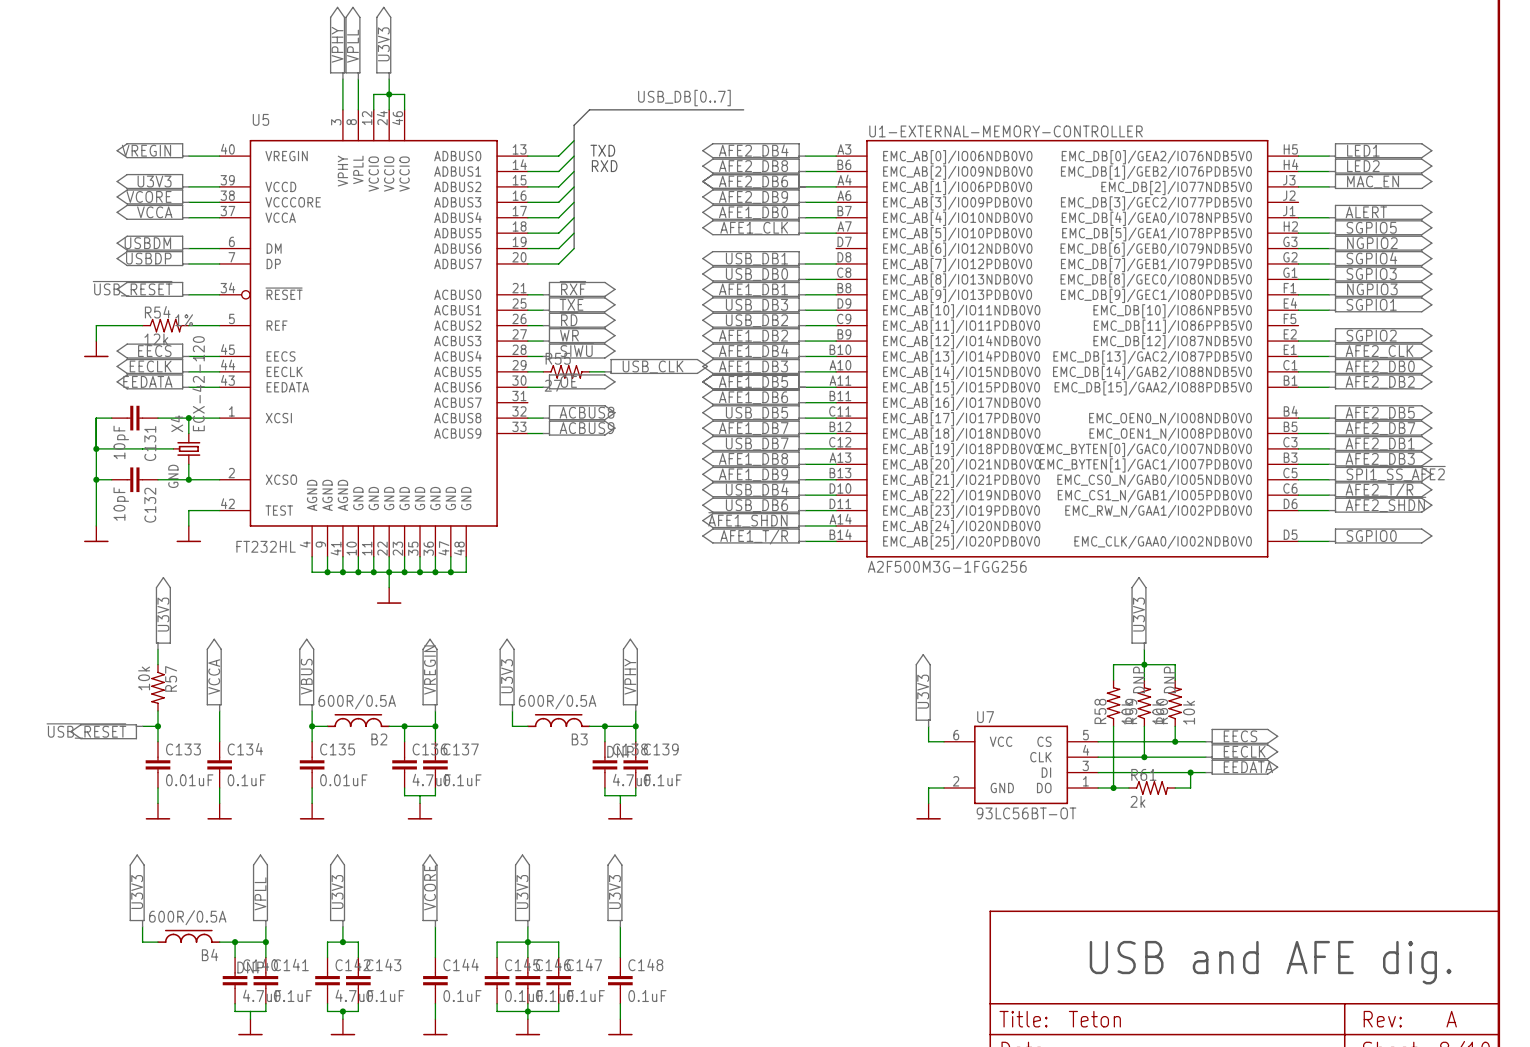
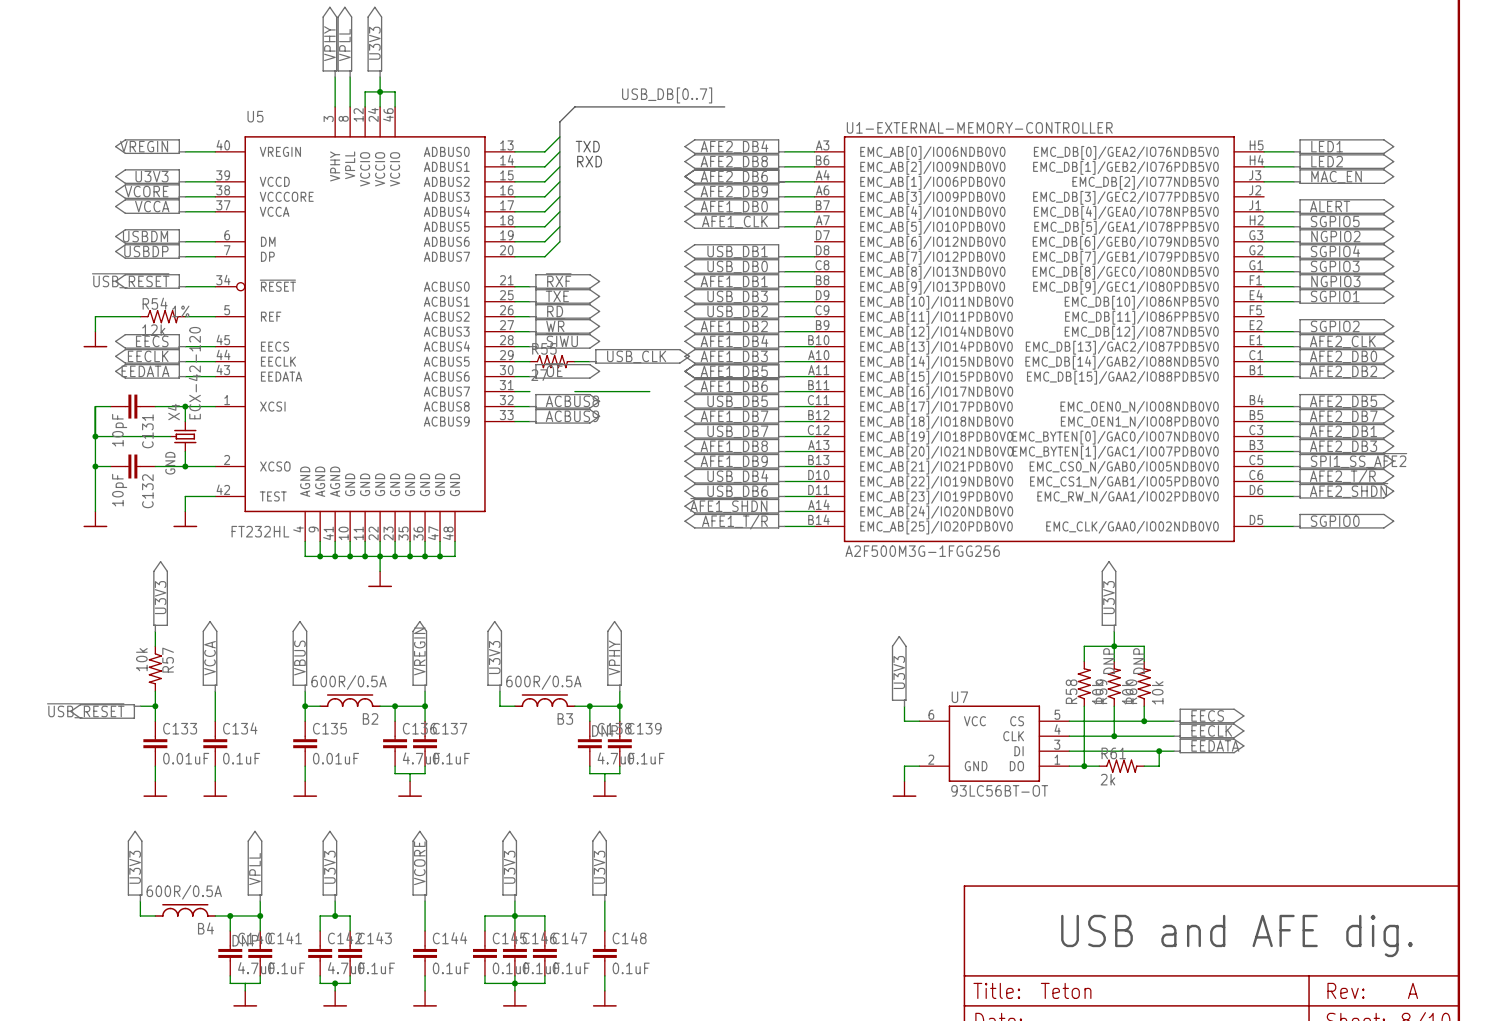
wire: none -> (514, 391) (529, 391)
wire: none -> (574, 391) (649, 391)

